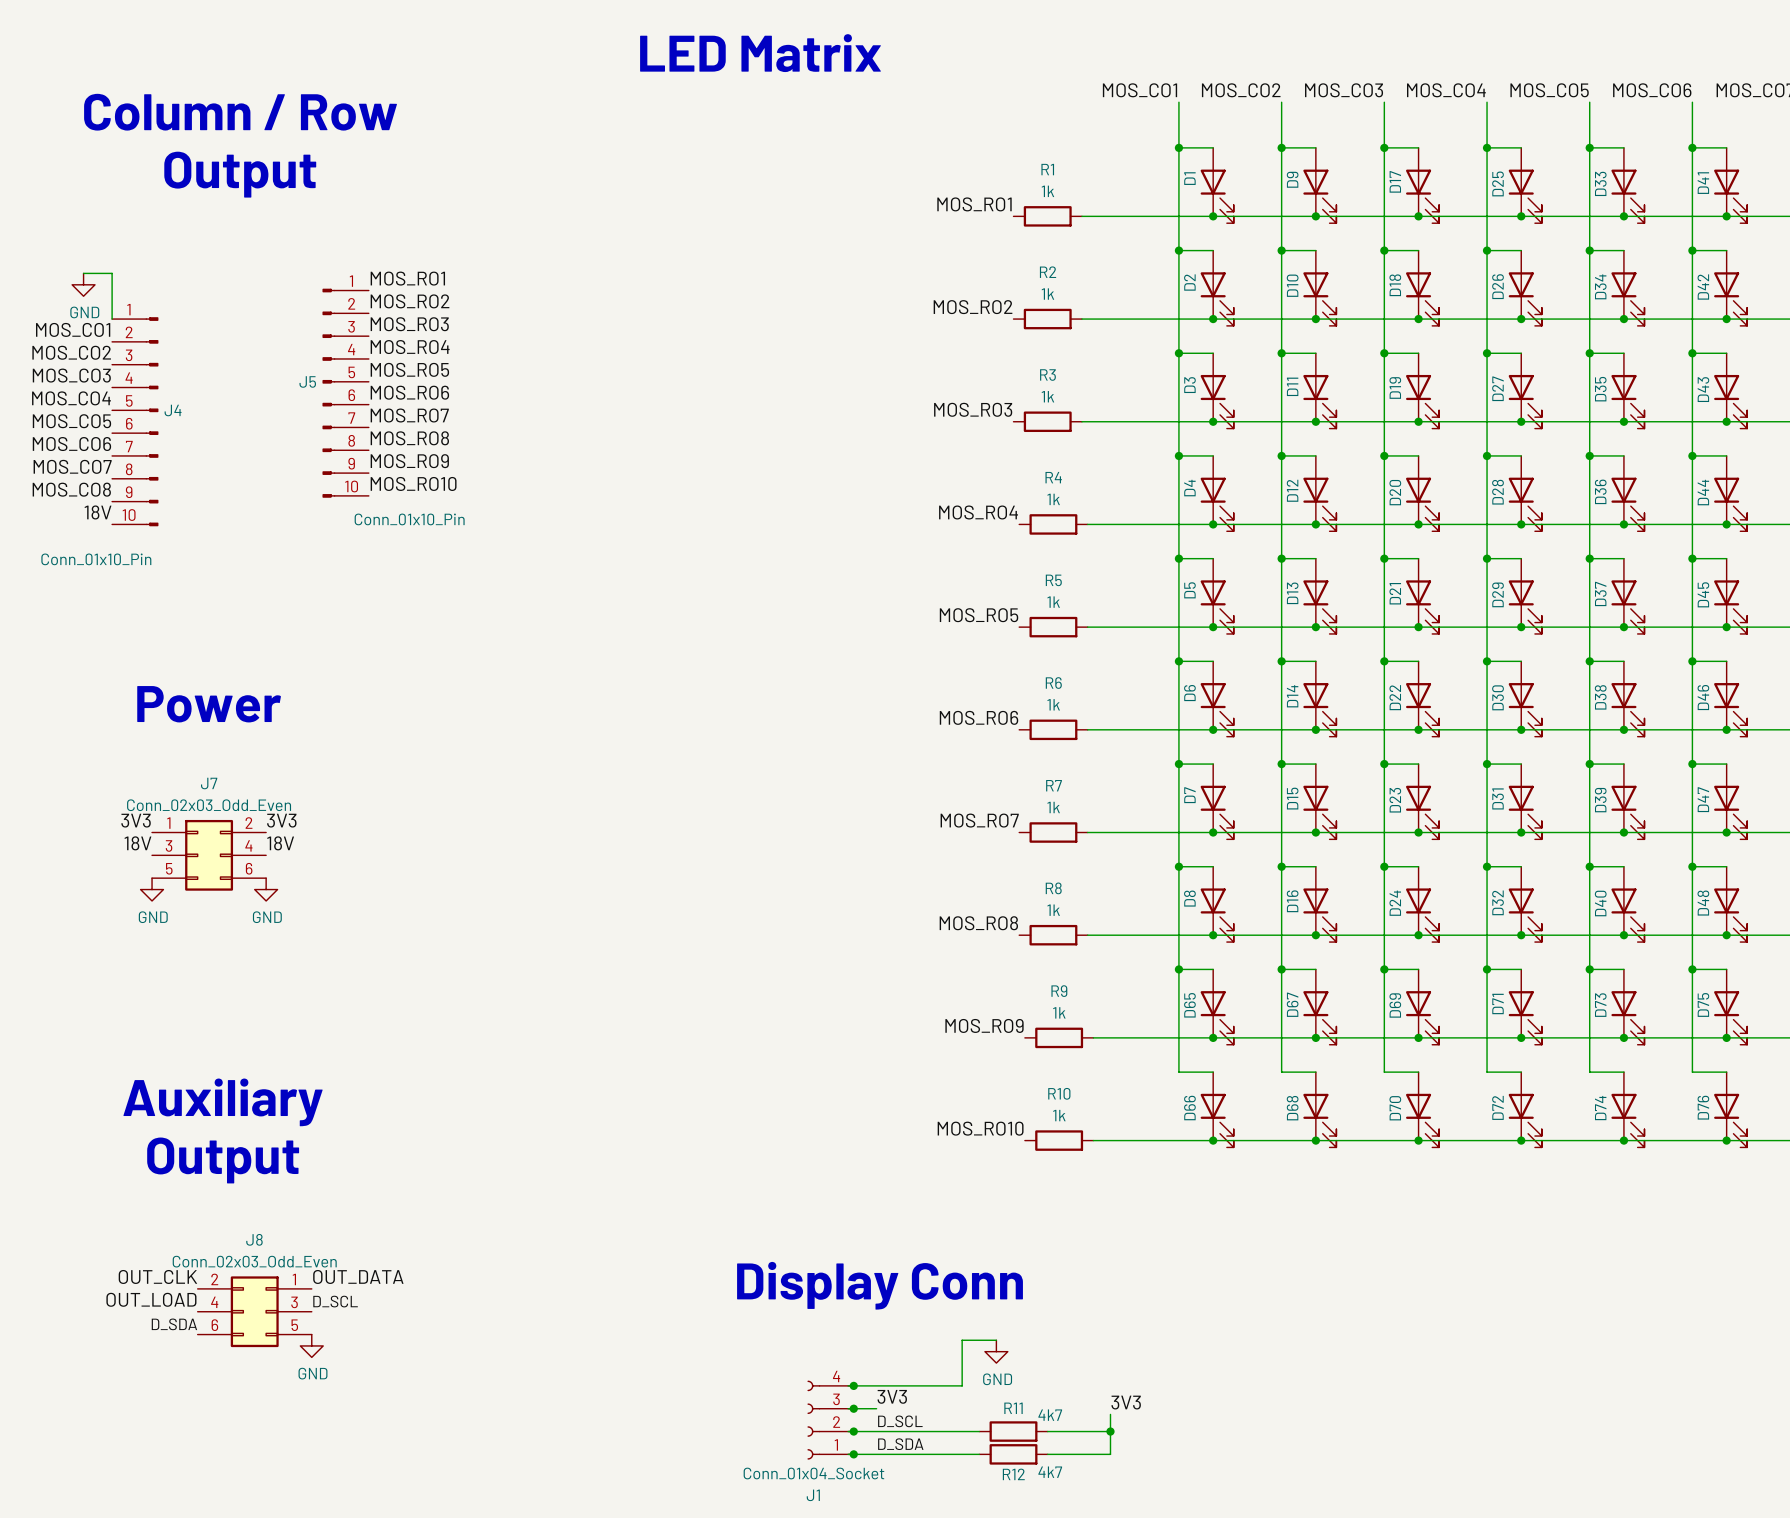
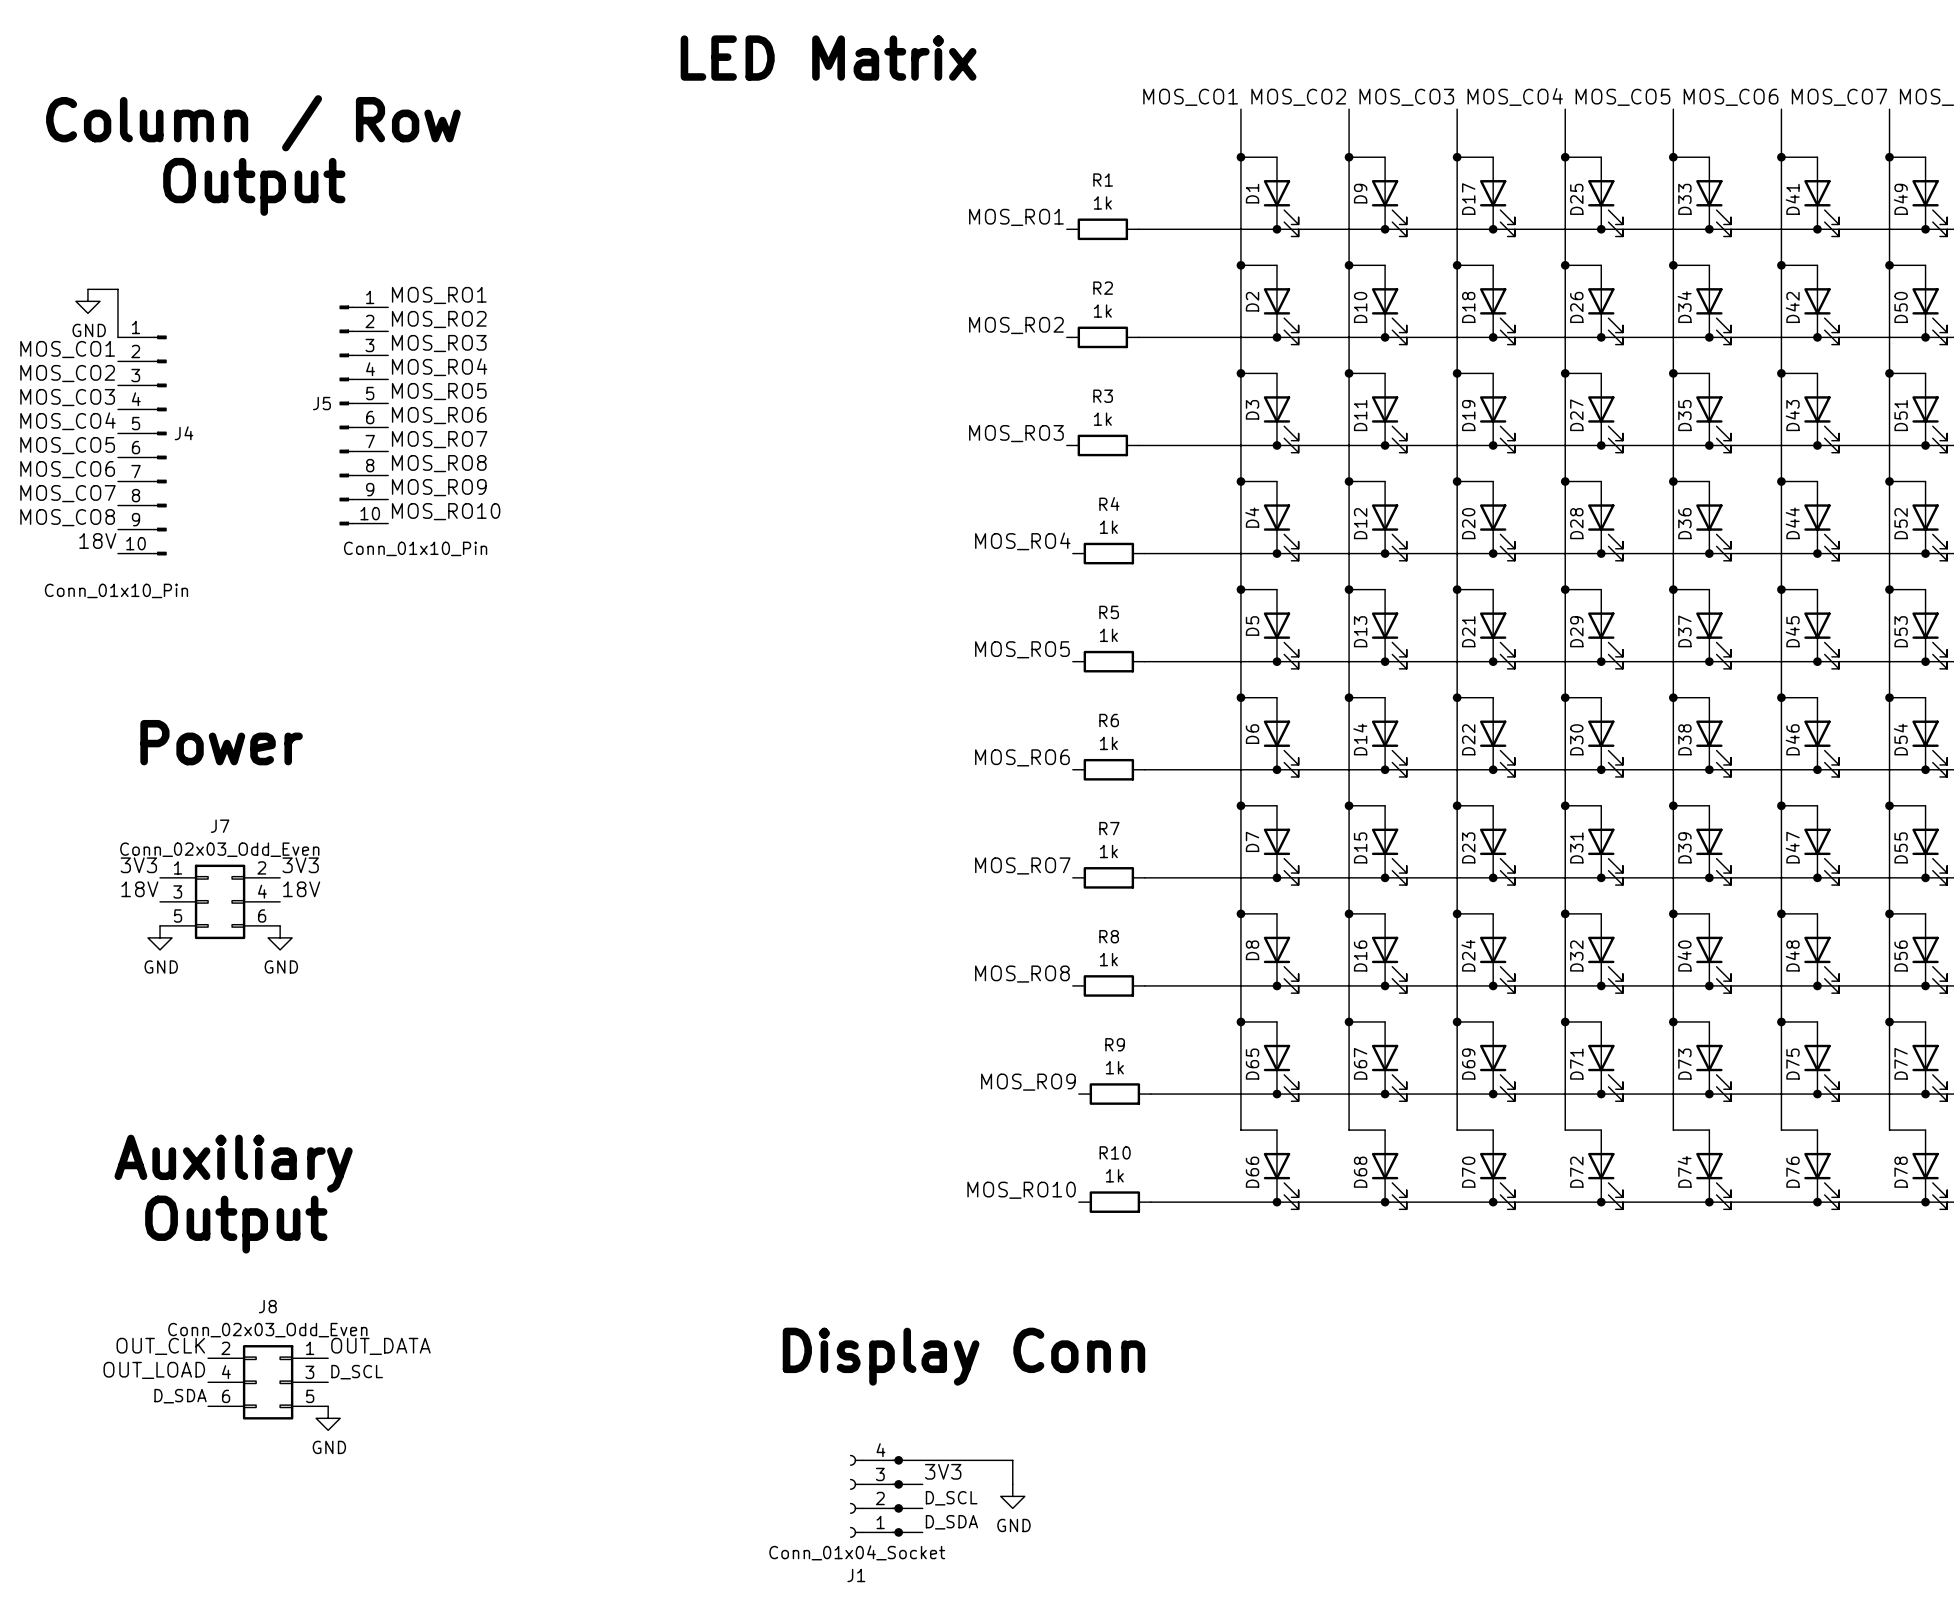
wire: (996, 1340) (962, 1340) (962, 1385) -> (1012, 1484) (1012, 1460)
power symbol position: GND (996, 1351) -> GND (1012, 1496)
label: 3V3 (1126, 1402) -> none
wire: (1110, 1414) (1110, 1454) (1047, 1454) -> none
wire: (876, 1431) (979, 1431) -> none
R11: 4k7 (1013, 1431) -> none
wire: (1047, 1431) (1110, 1431) -> none
junction: (1110, 1431) -> none
wire: (876, 1454) (979, 1454) -> none
R12: 4k7 (1013, 1454) -> none

